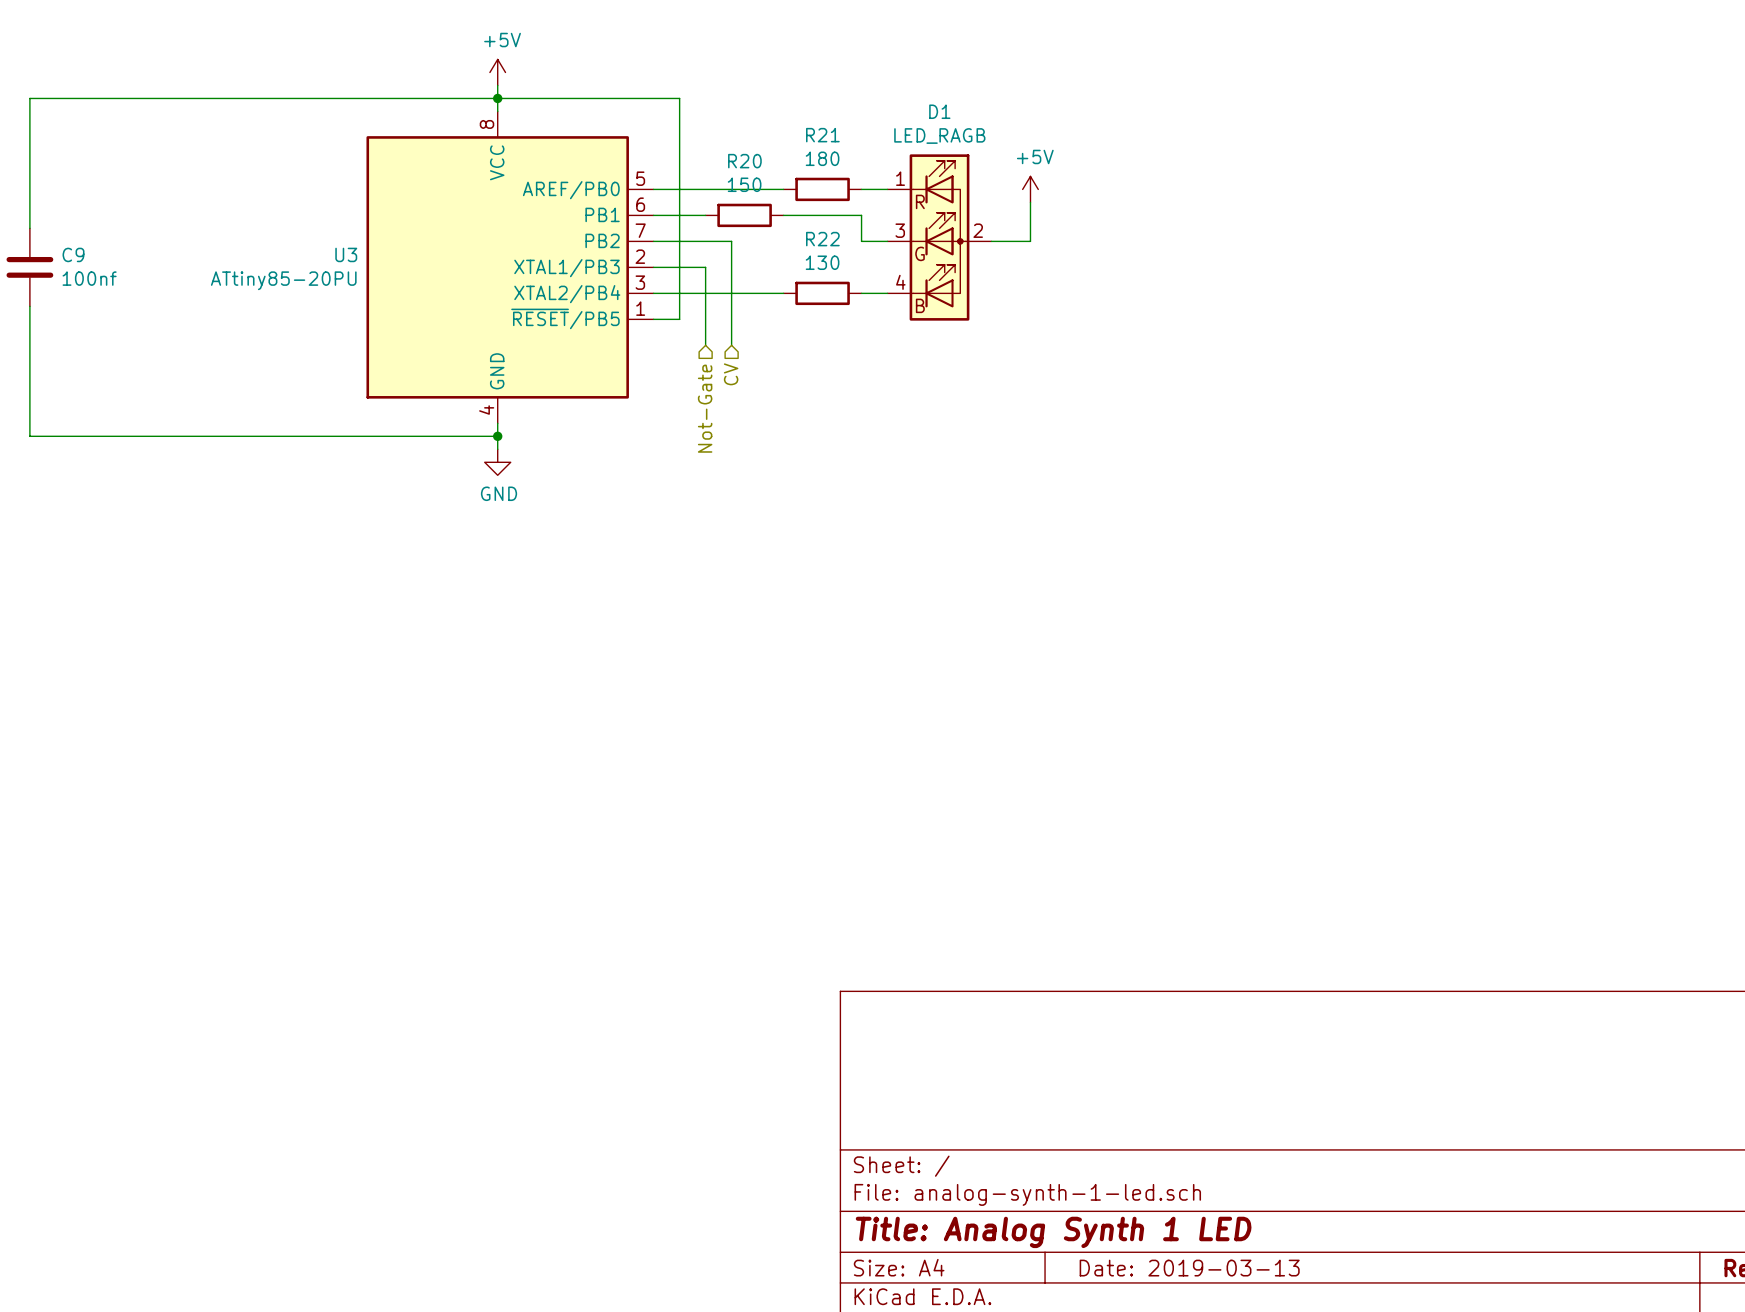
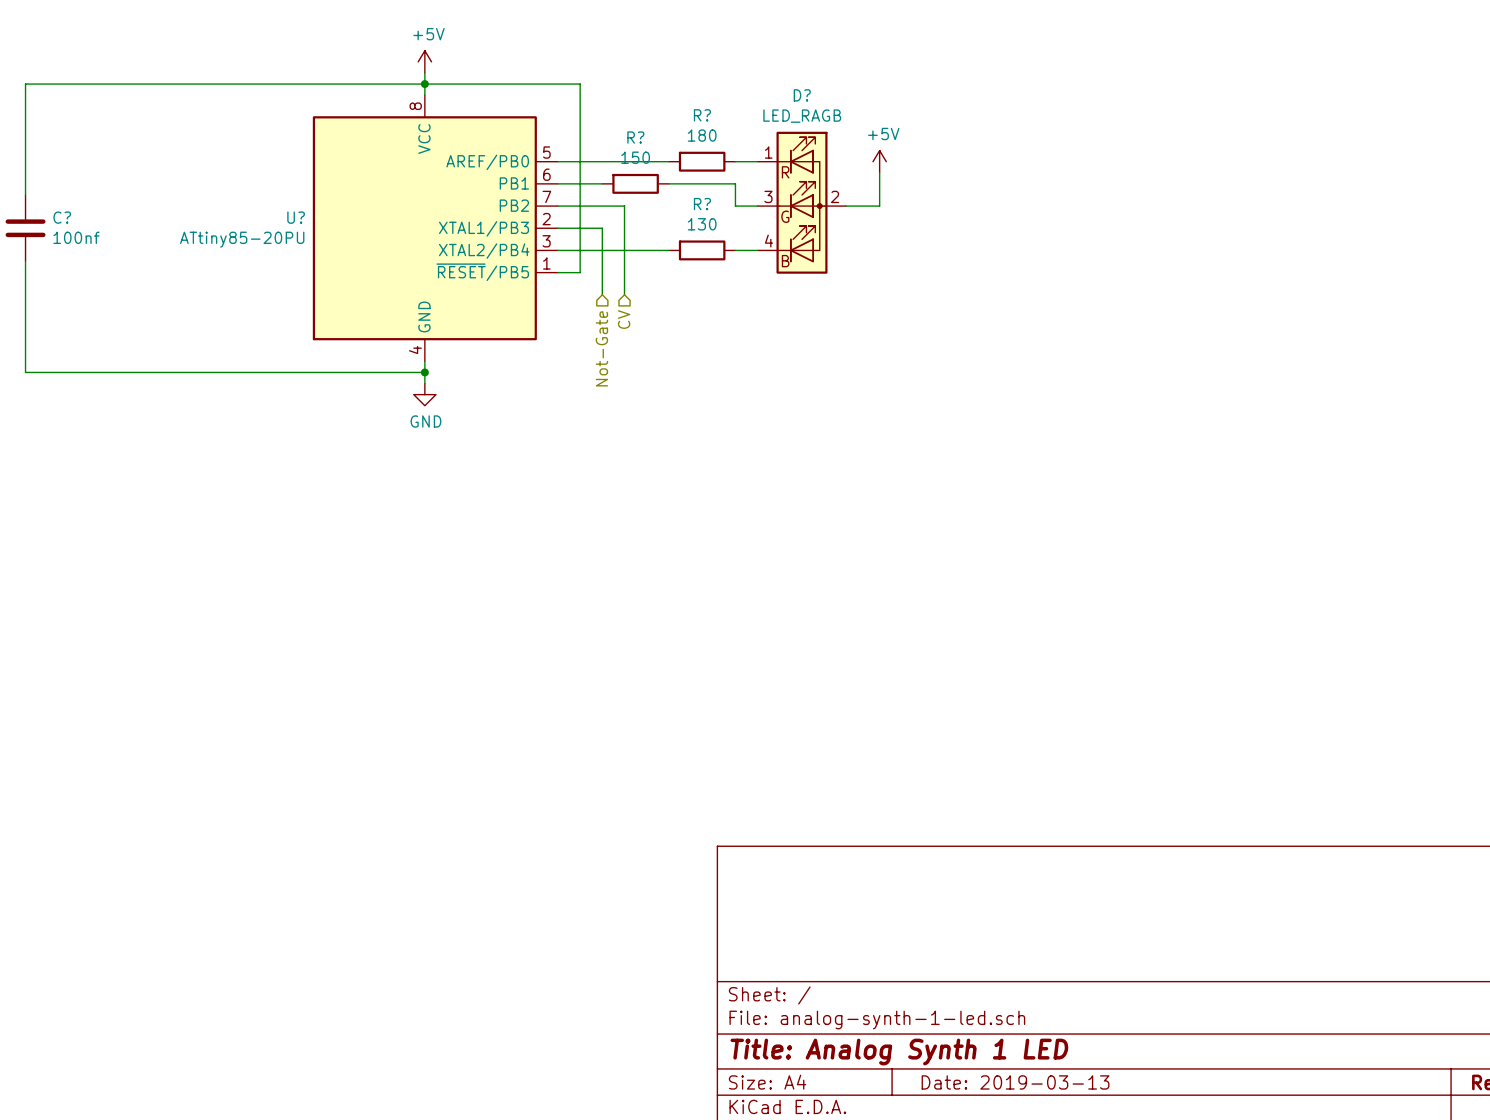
D1 name: D1 (939, 111) -> D? (802, 95)
R21 name: R21 (822, 135) -> R? (702, 115)
R20 name: R20 (744, 161) -> R? (635, 137)
R22 name: R22 (822, 239) -> R? (702, 204)
C9 name: C9 (73, 254) -> C? (62, 217)
U3 name: U3 (346, 254) -> U? (296, 217)

